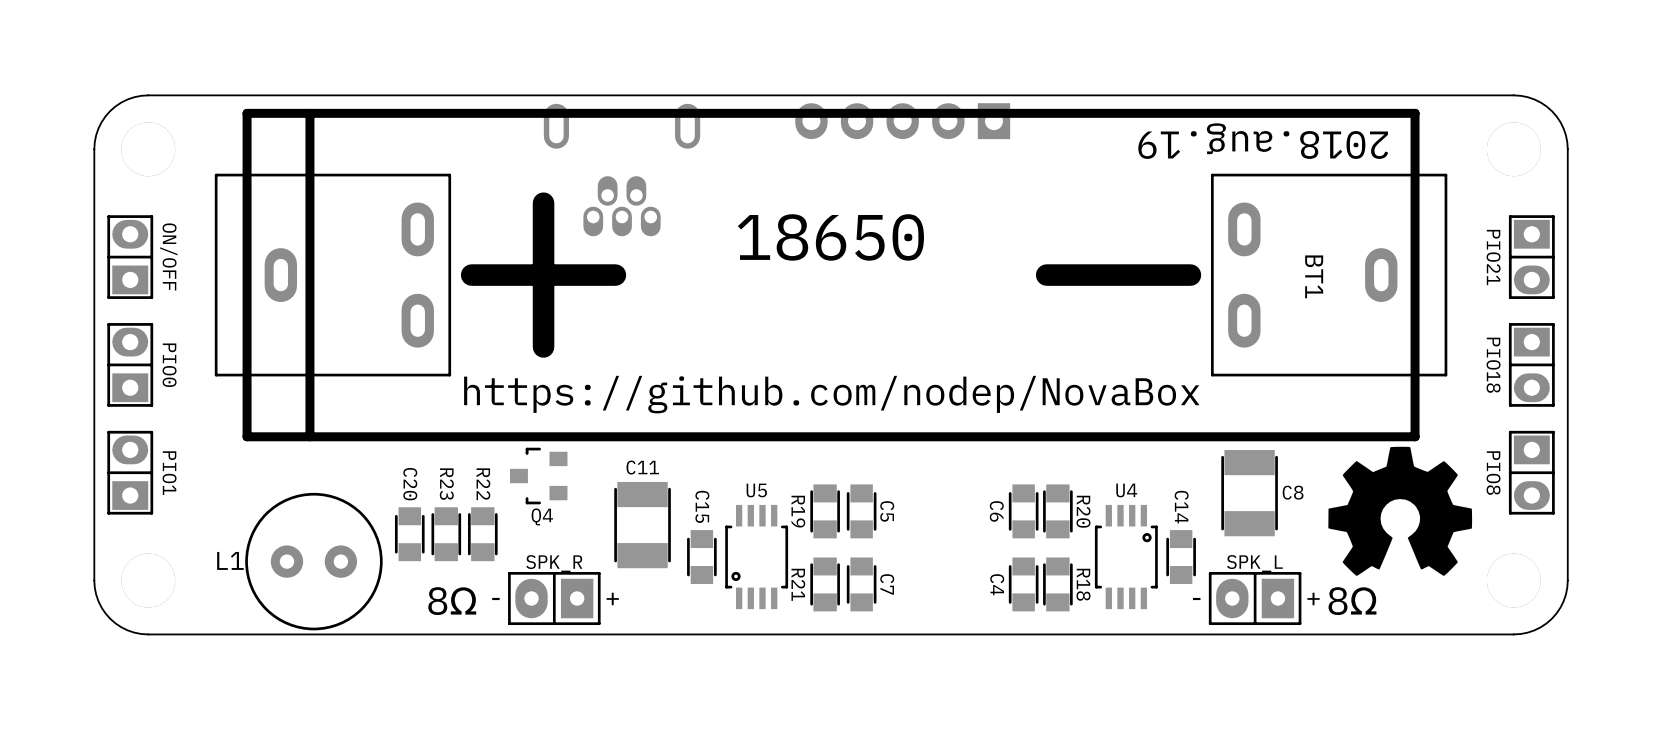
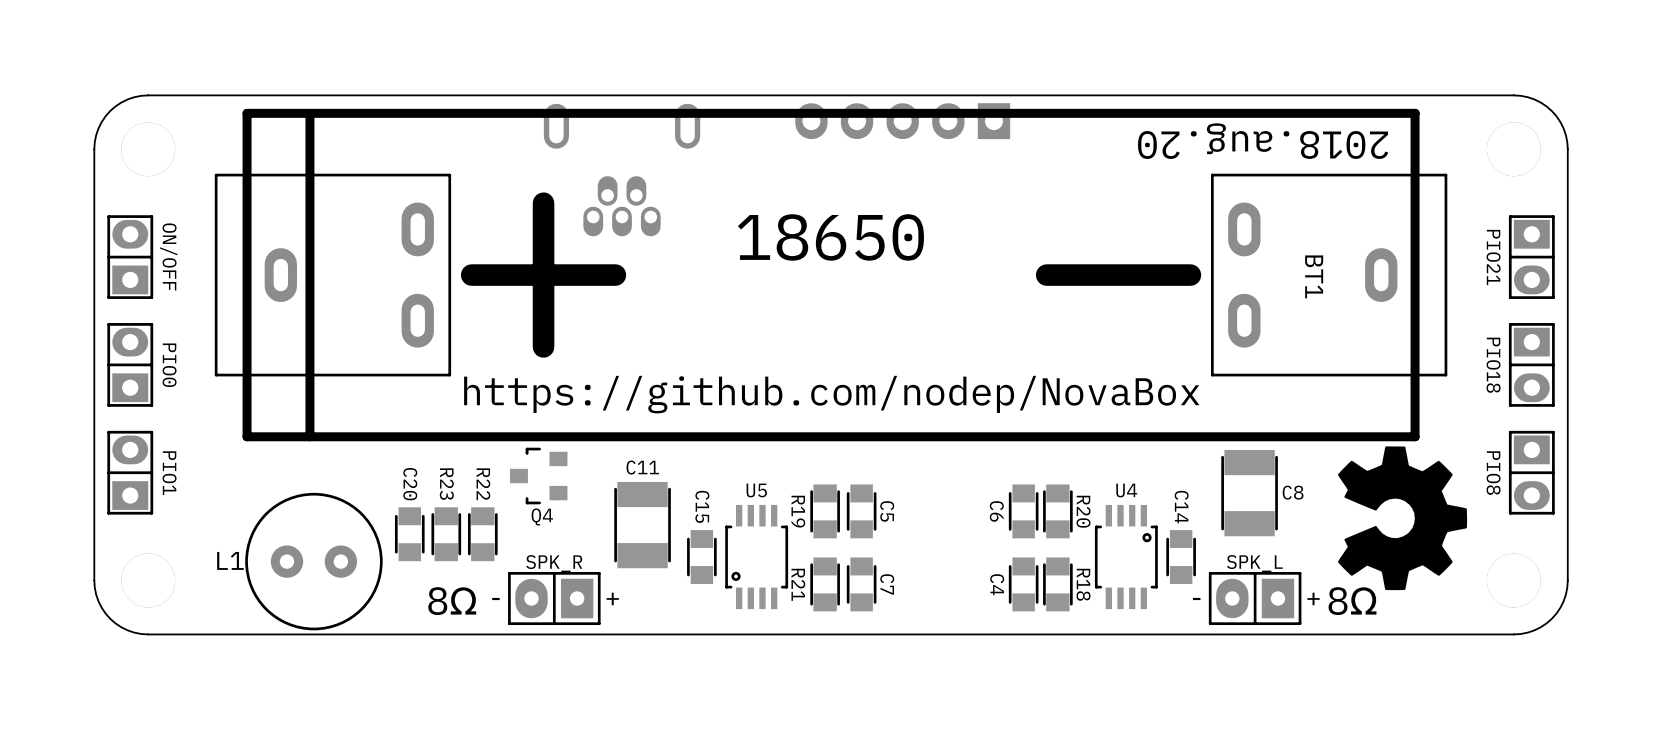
text: 2018.aug.19 (1263, 141) -> 2018.aug.20 (1263, 141)
drawing shape: [1328, 446, 1473, 576] -> [1337, 446, 1468, 591]

